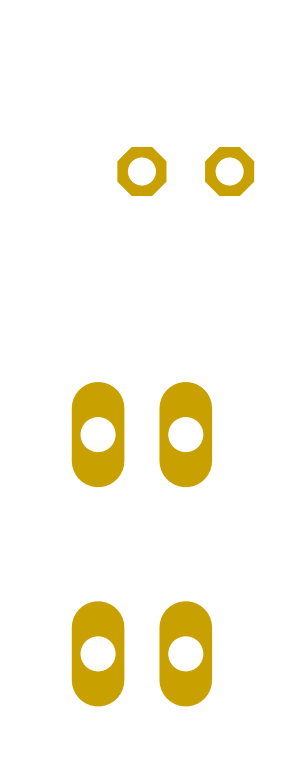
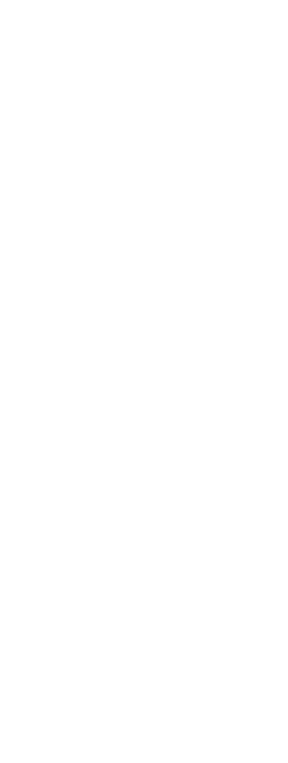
part: (185, 171) -> none
part: (141, 434) -> none
part: (141, 653) -> none

